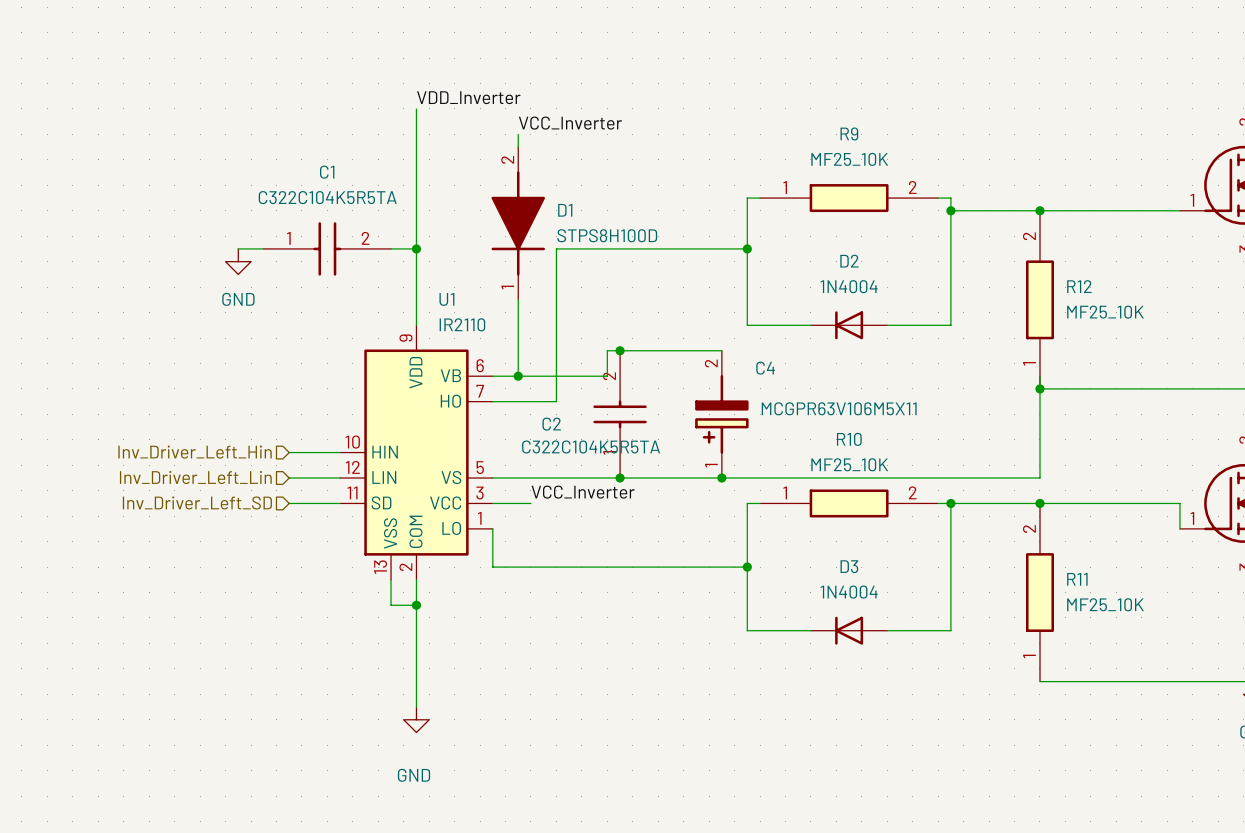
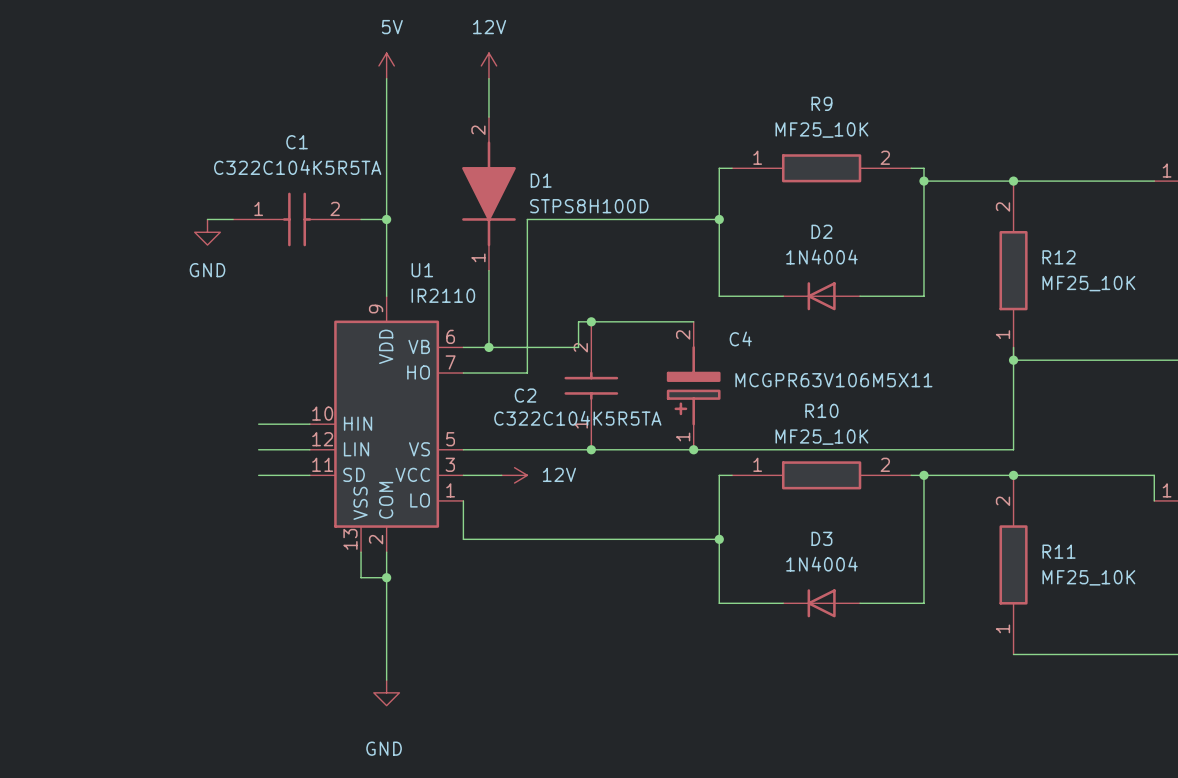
power symbol: none -> 5V (386, 65)
power symbol: none -> 12V (488, 65)
label: VDD_Inverter (468, 97) -> none
wire: none -> (488, 78) (488, 104)
label: VCC_Inverter (570, 123) -> none
hierarchical label: Inv_Driver_Left_Hin (195, 452) -> none
hierarchical label: Inv_Driver_Left_Lin (195, 477) -> none
label: VCC_Inverter (583, 492) -> none
hierarchical label: Inv_Driver_Left_SD (197, 502) -> none
power symbol: none -> 12V (514, 475)

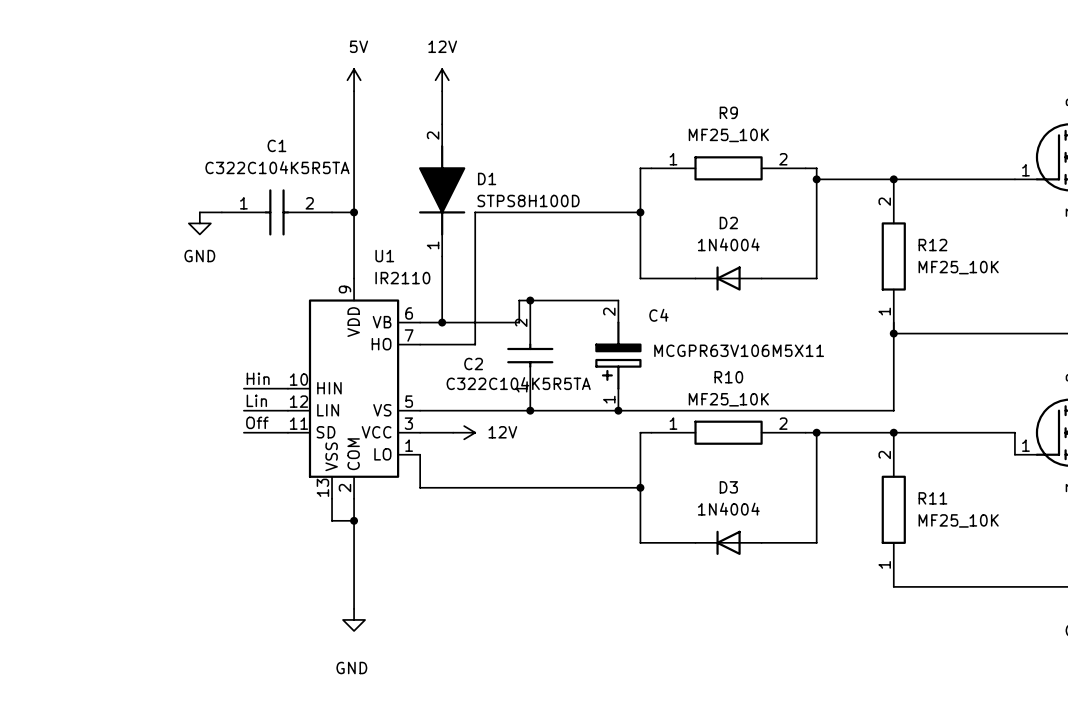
label: none -> Hin (258, 378)
label: none -> Lin (256, 400)
label: none -> Off (257, 422)

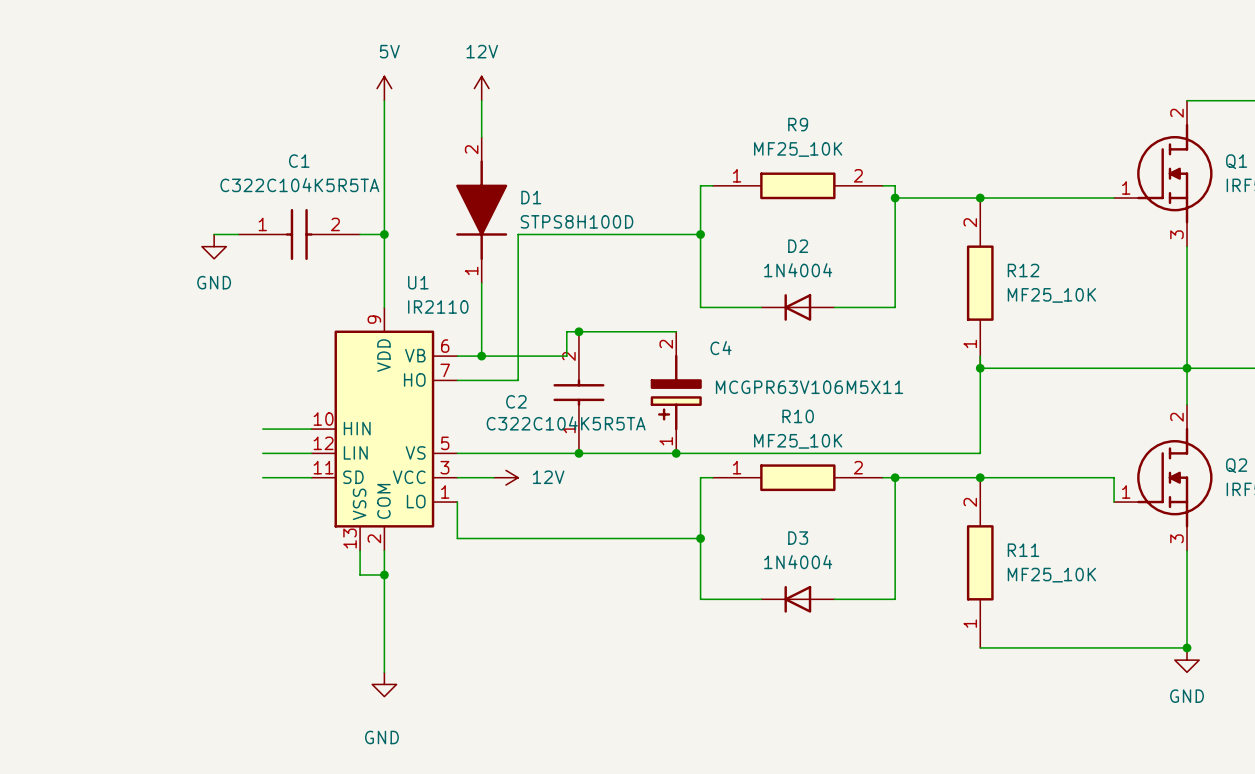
label: Hin (258, 378) -> none
label: Lin (256, 400) -> none
label: Off (257, 422) -> none

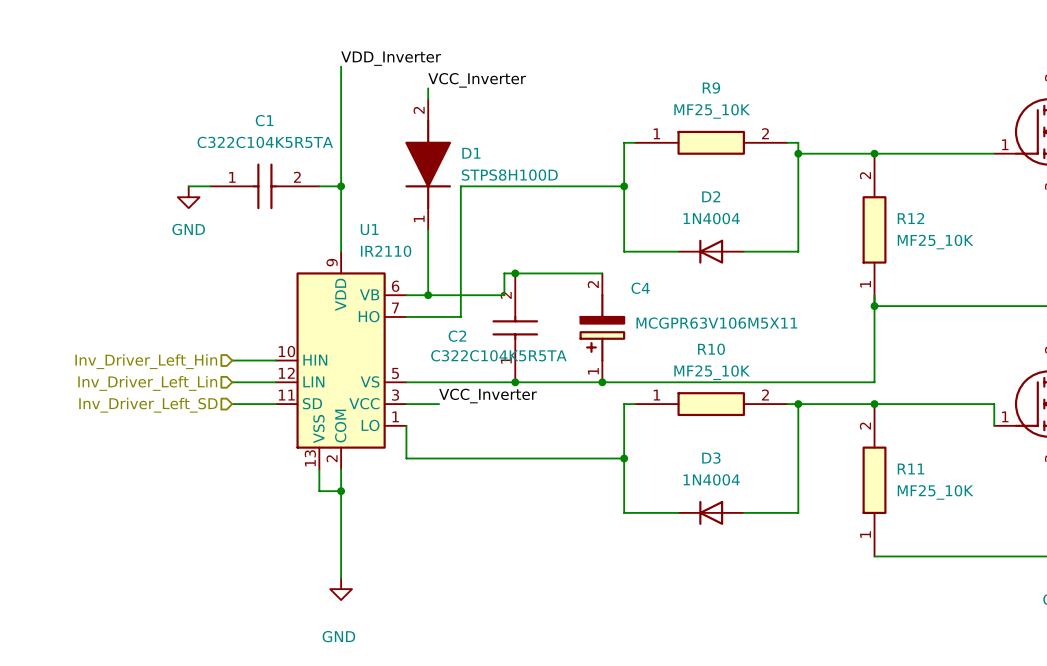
power symbol: 5V (384, 88) -> none
power symbol: 12V (481, 88) -> none
label: none -> VDD_Inverter (391, 58)
wire: (481, 100) (481, 125) -> none
label: none -> VCC_Inverter (477, 80)
hierarchical label: none -> Inv_Driver_Left_Hin (146, 361)
hierarchical label: none -> Inv_Driver_Left_Lin (147, 383)
label: none -> VCC_Inverter (488, 396)
hierarchical label: none -> Inv_Driver_Left_SD (148, 405)
power symbol: 12V (506, 477) -> none

